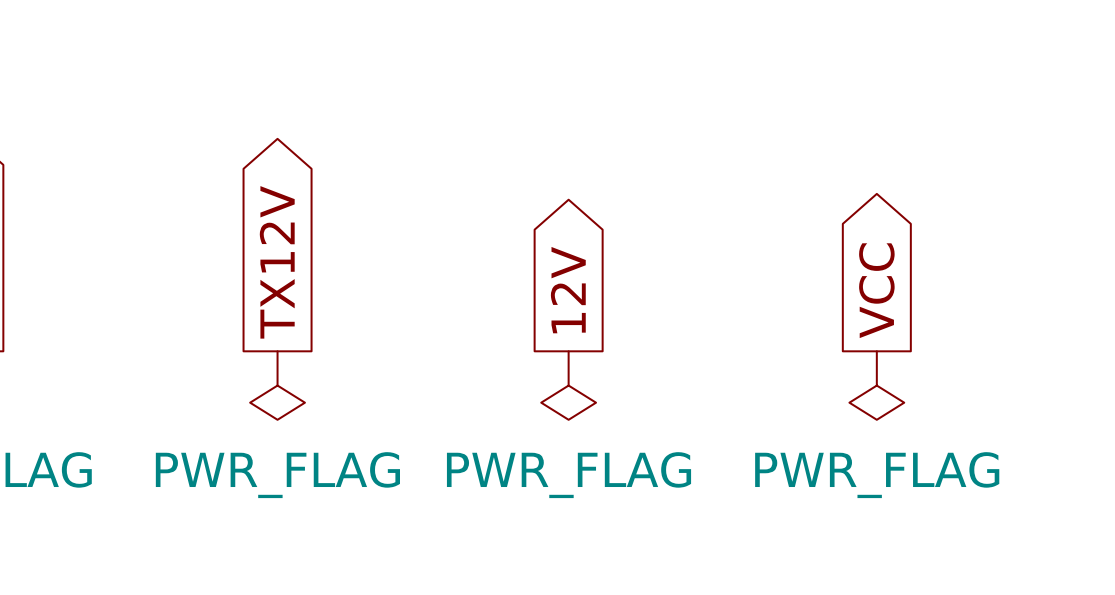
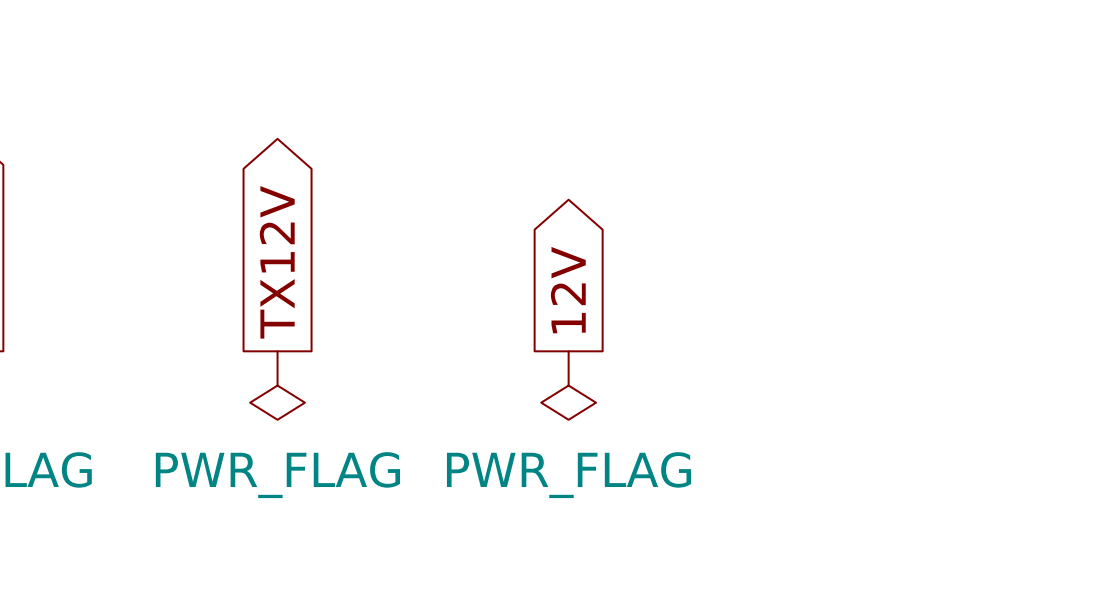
global label: VCC (876, 290) -> none
power symbol: PWR_FLAG (876, 385) -> none

